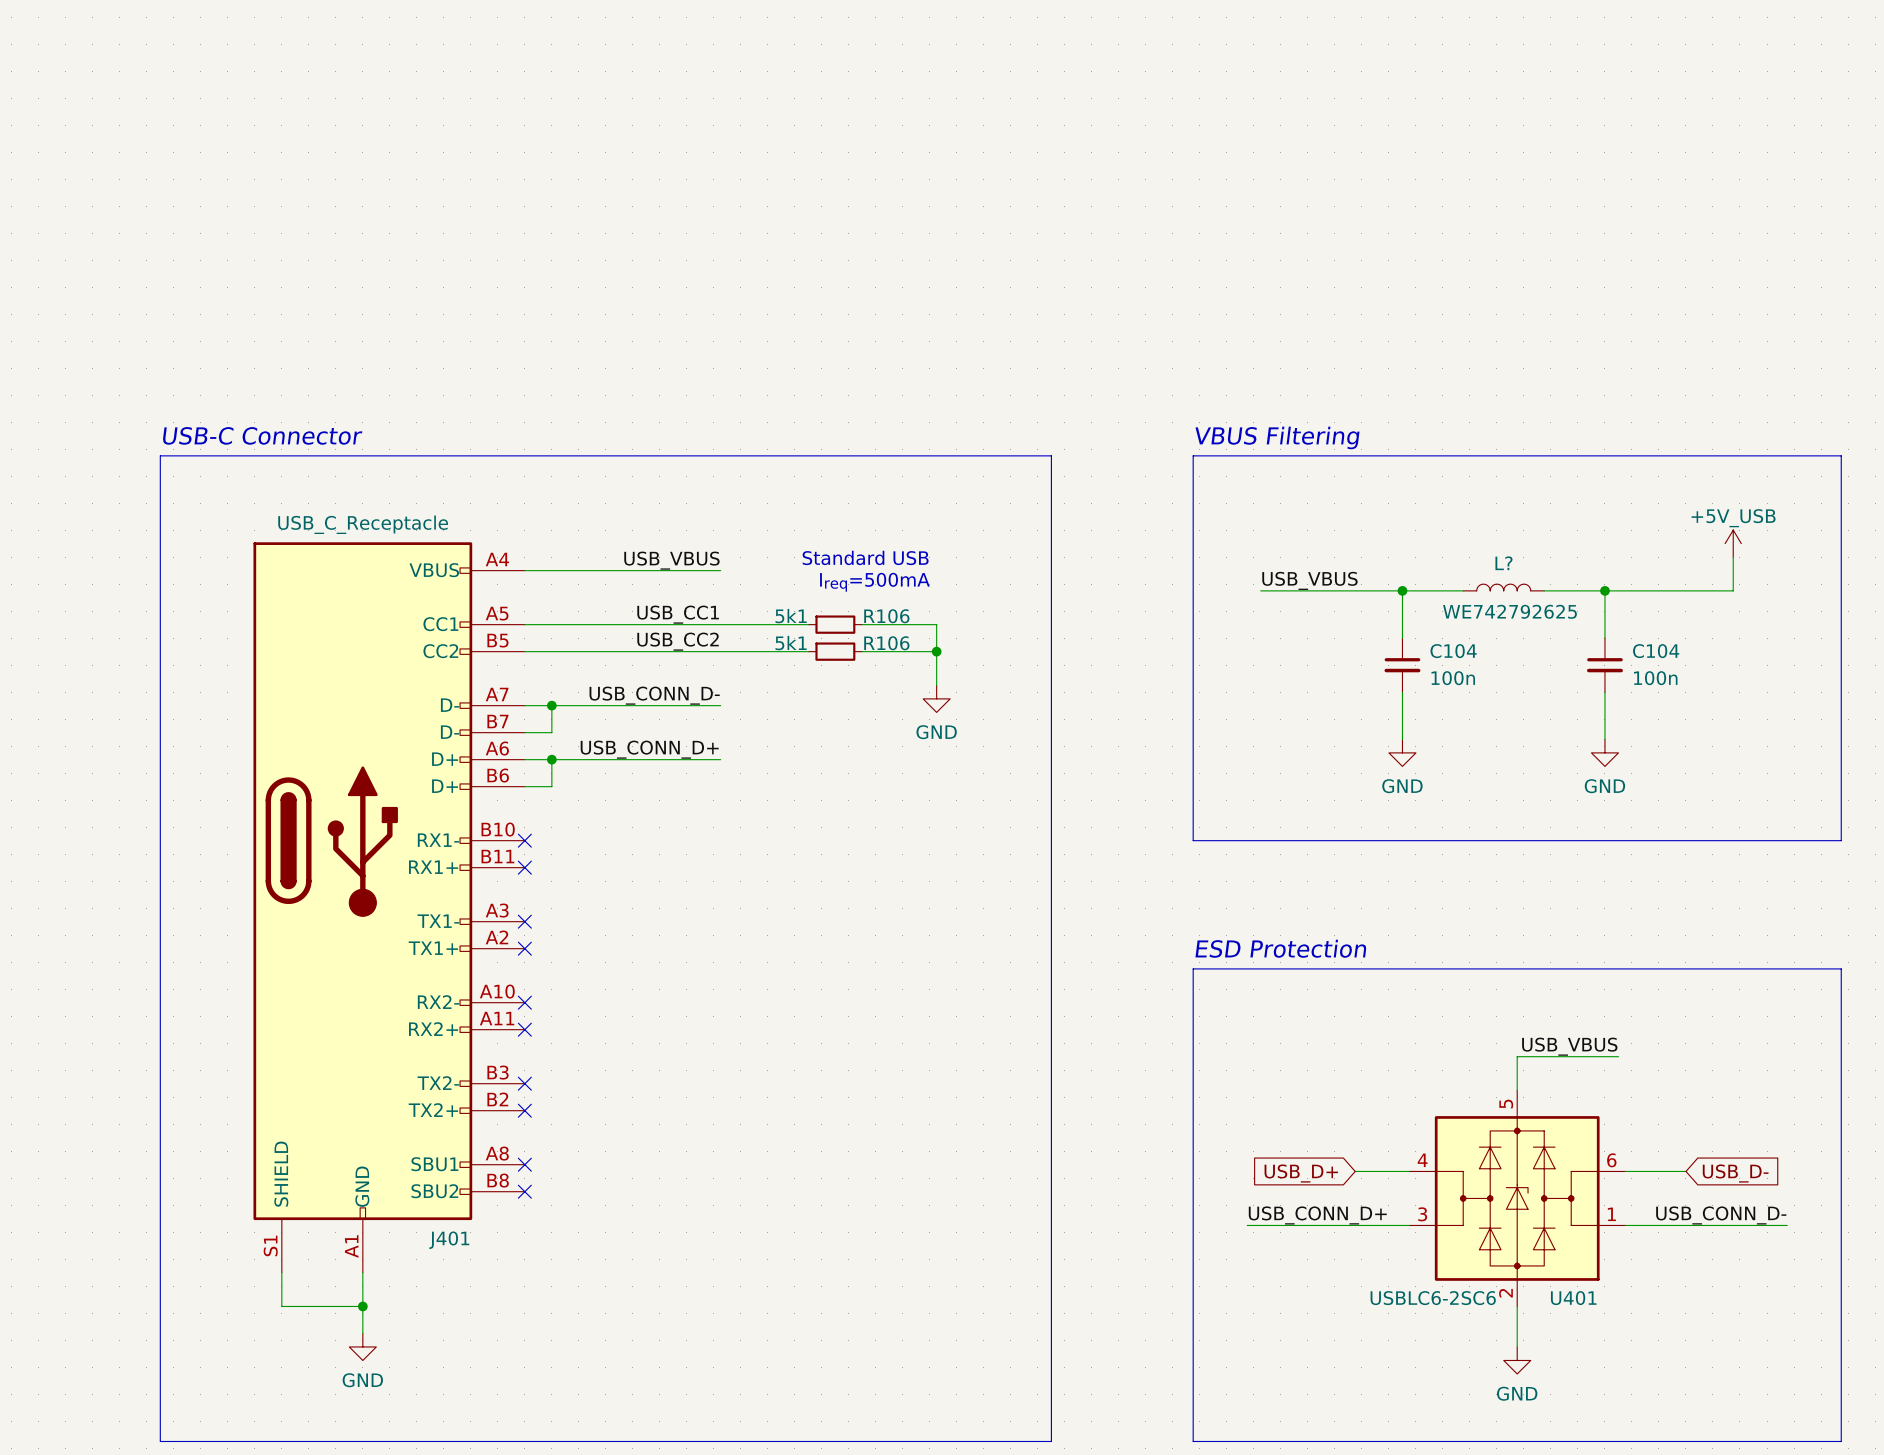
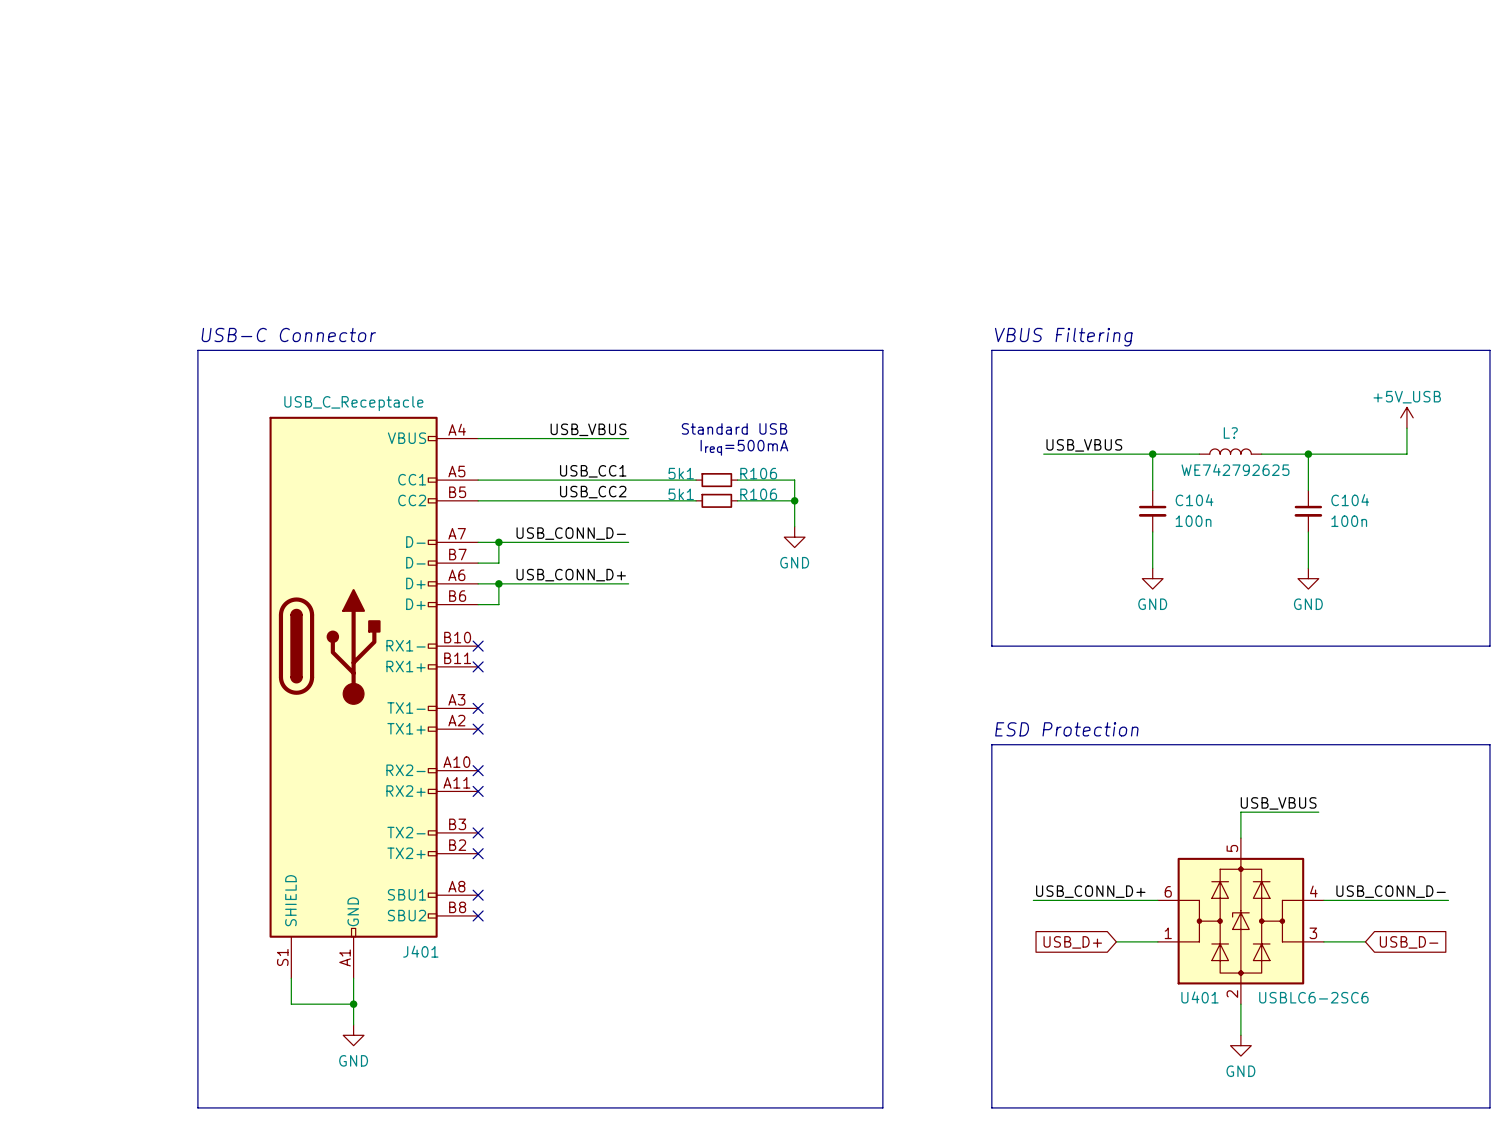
wire: none -> (1370, 900) (1448, 900)
global label position: USB_D+ (1301, 1173) -> USB_D+ (1072, 942)
global label position: USB_D- (1735, 1173) -> USB_D- (1409, 942)
U401 flip: as is (1517, 1198) -> left-right (1240, 921)
label position: USB_CONN_D+ (1317, 1215) -> USB_CONN_D+ (1090, 891)
label position: USB_CONN_D- (1721, 1215) -> USB_CONN_D- (1391, 891)
wire: (1247, 1225) (1355, 1225) -> (1033, 900) (1116, 900)
wire: (1679, 1225) (1787, 1225) -> none

